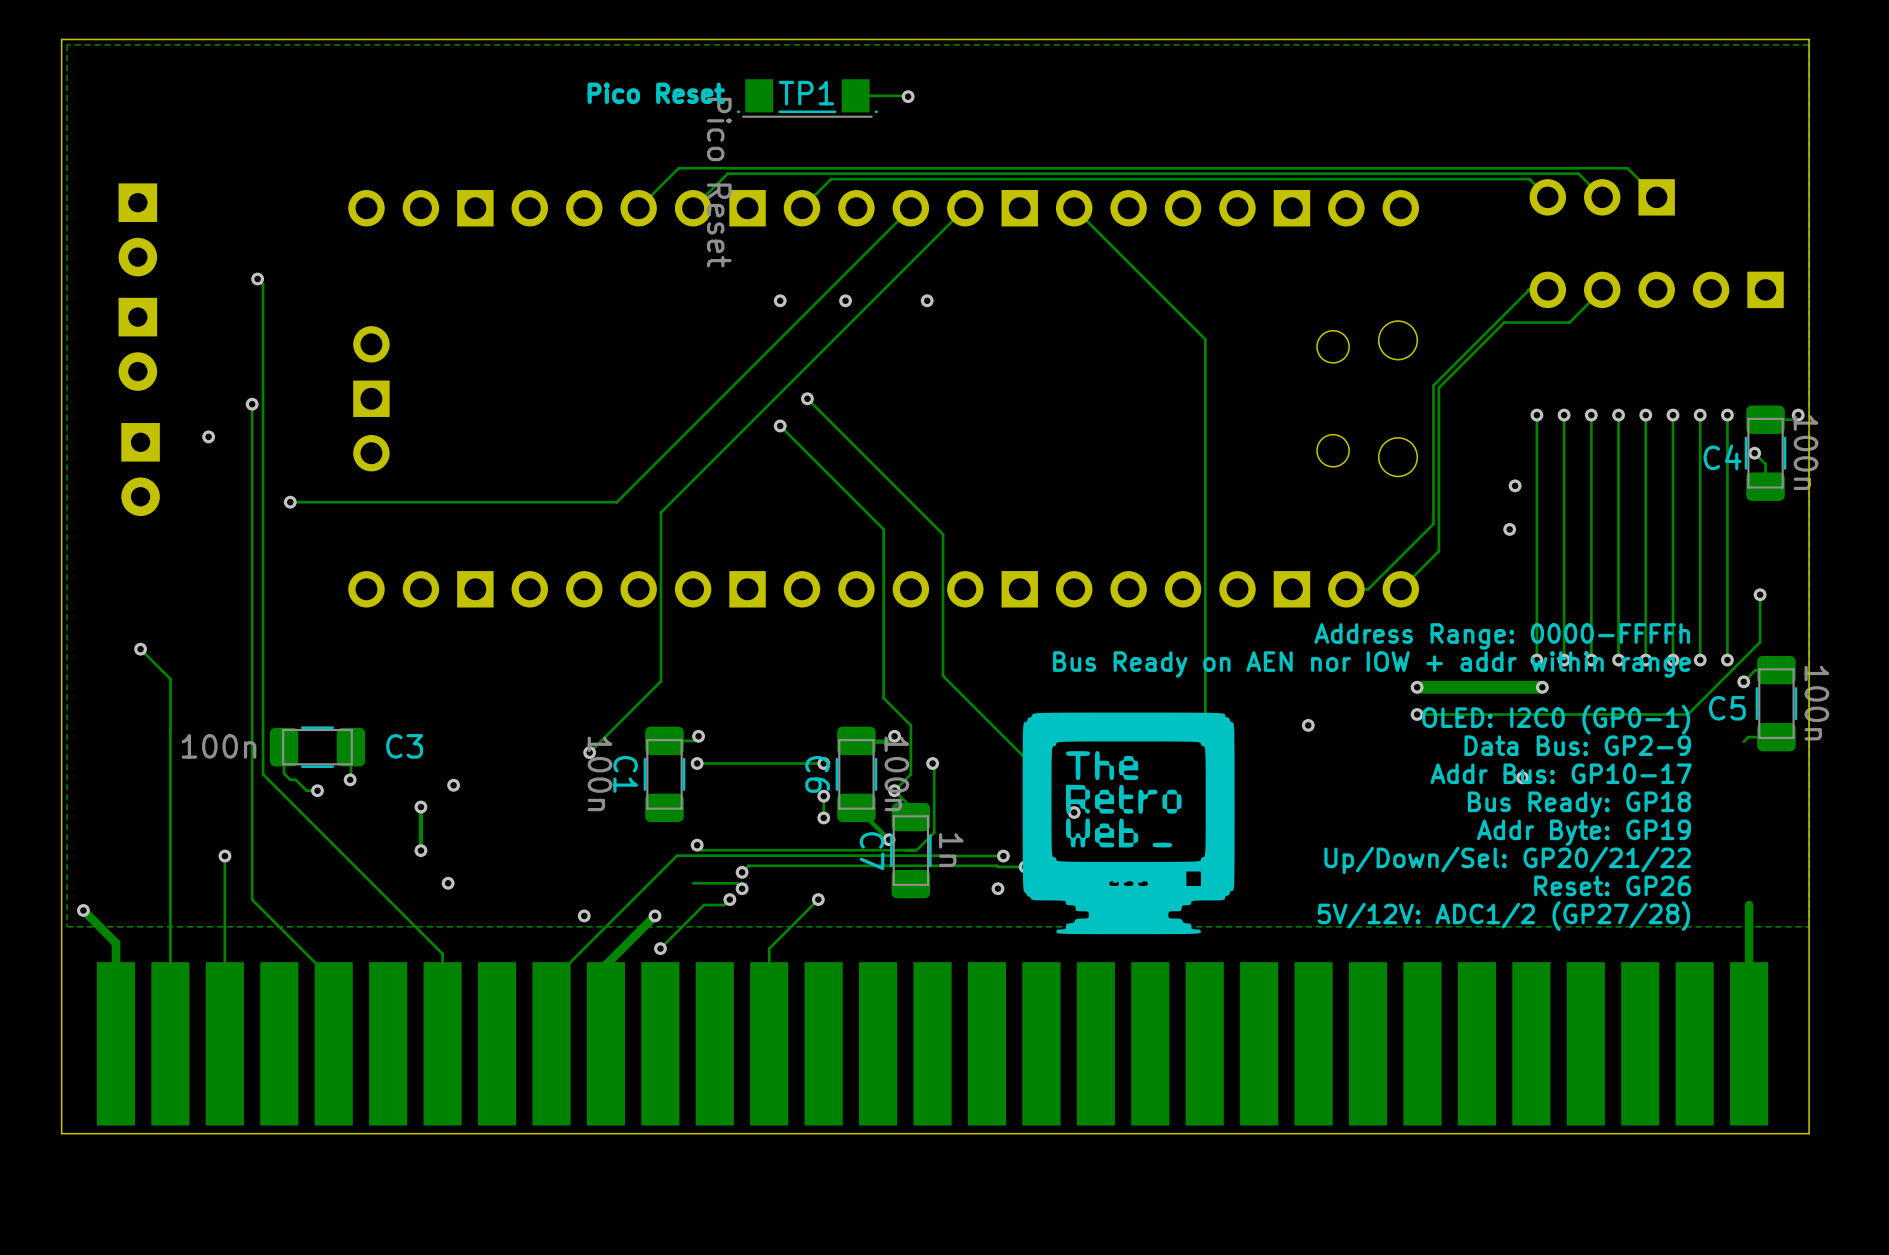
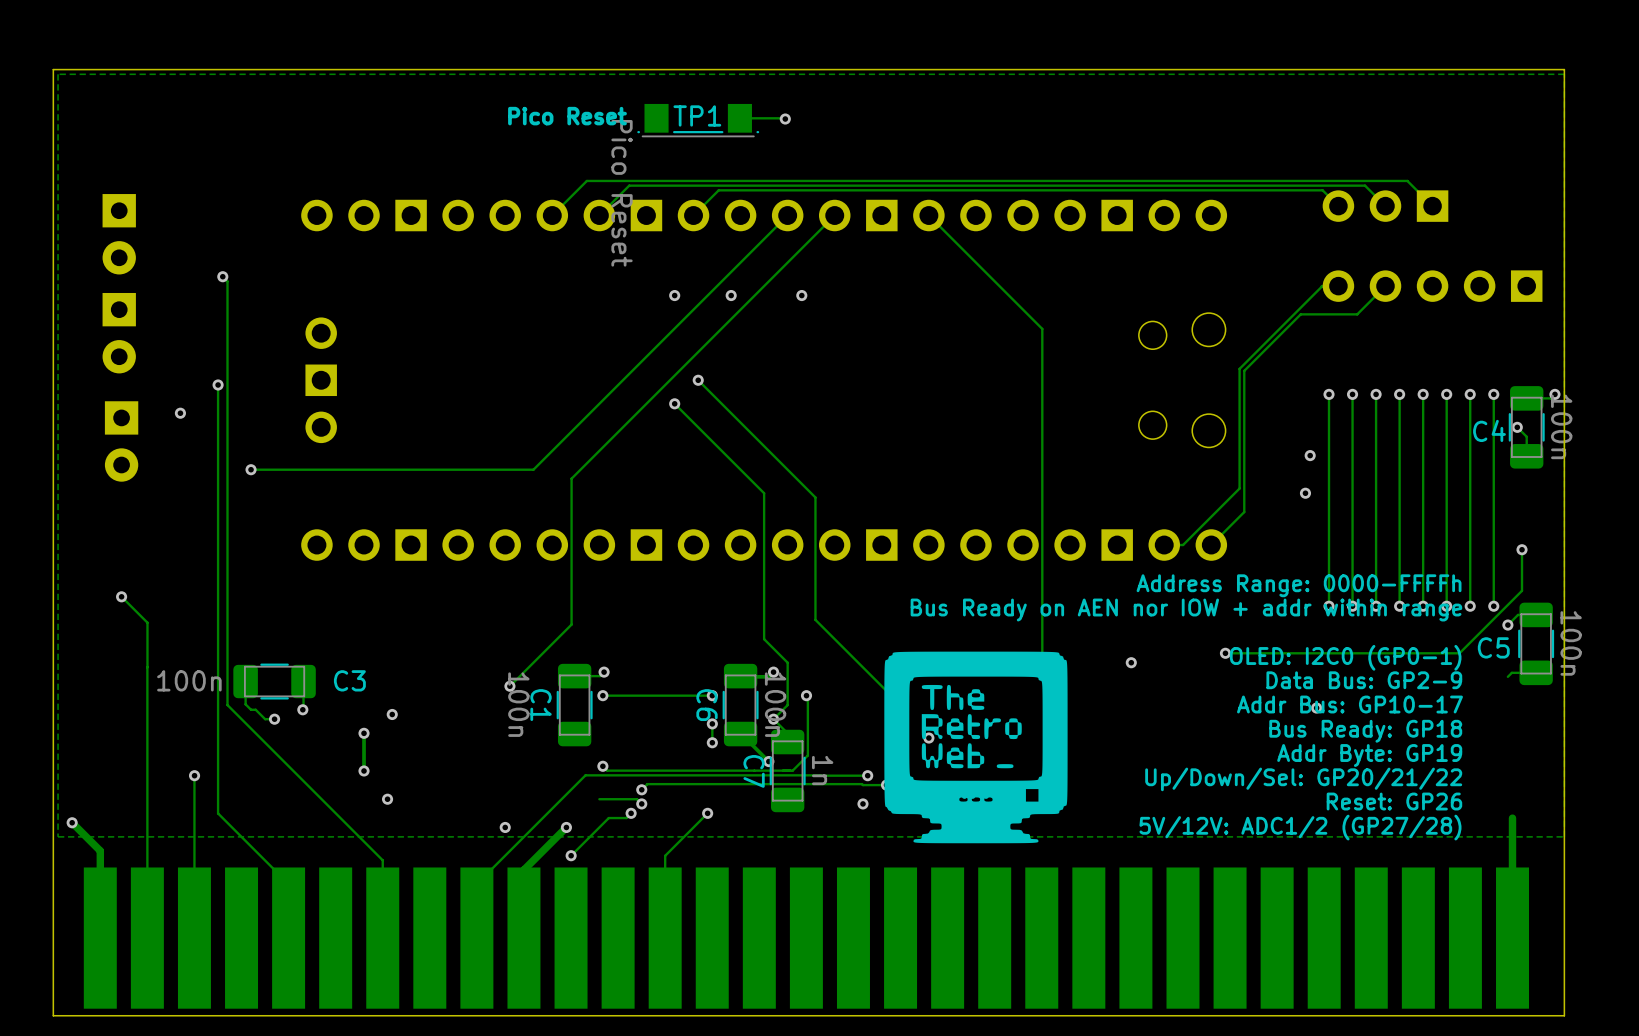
via: (1417, 687) -> none
track: (1542, 687) (1417, 687) -> none
via: (1542, 687) -> none

